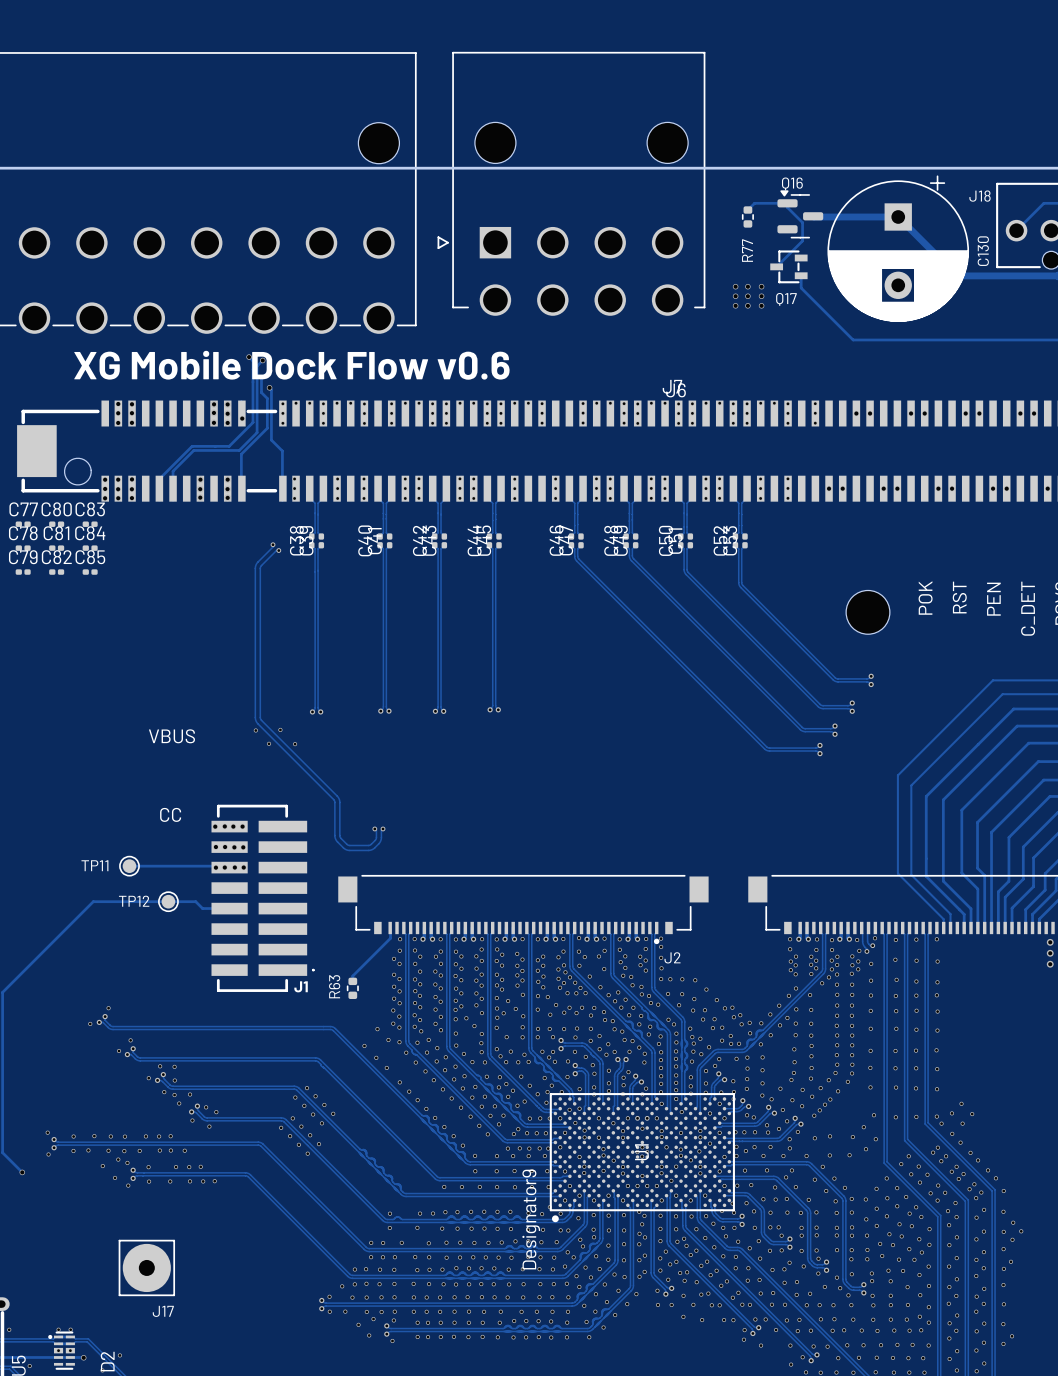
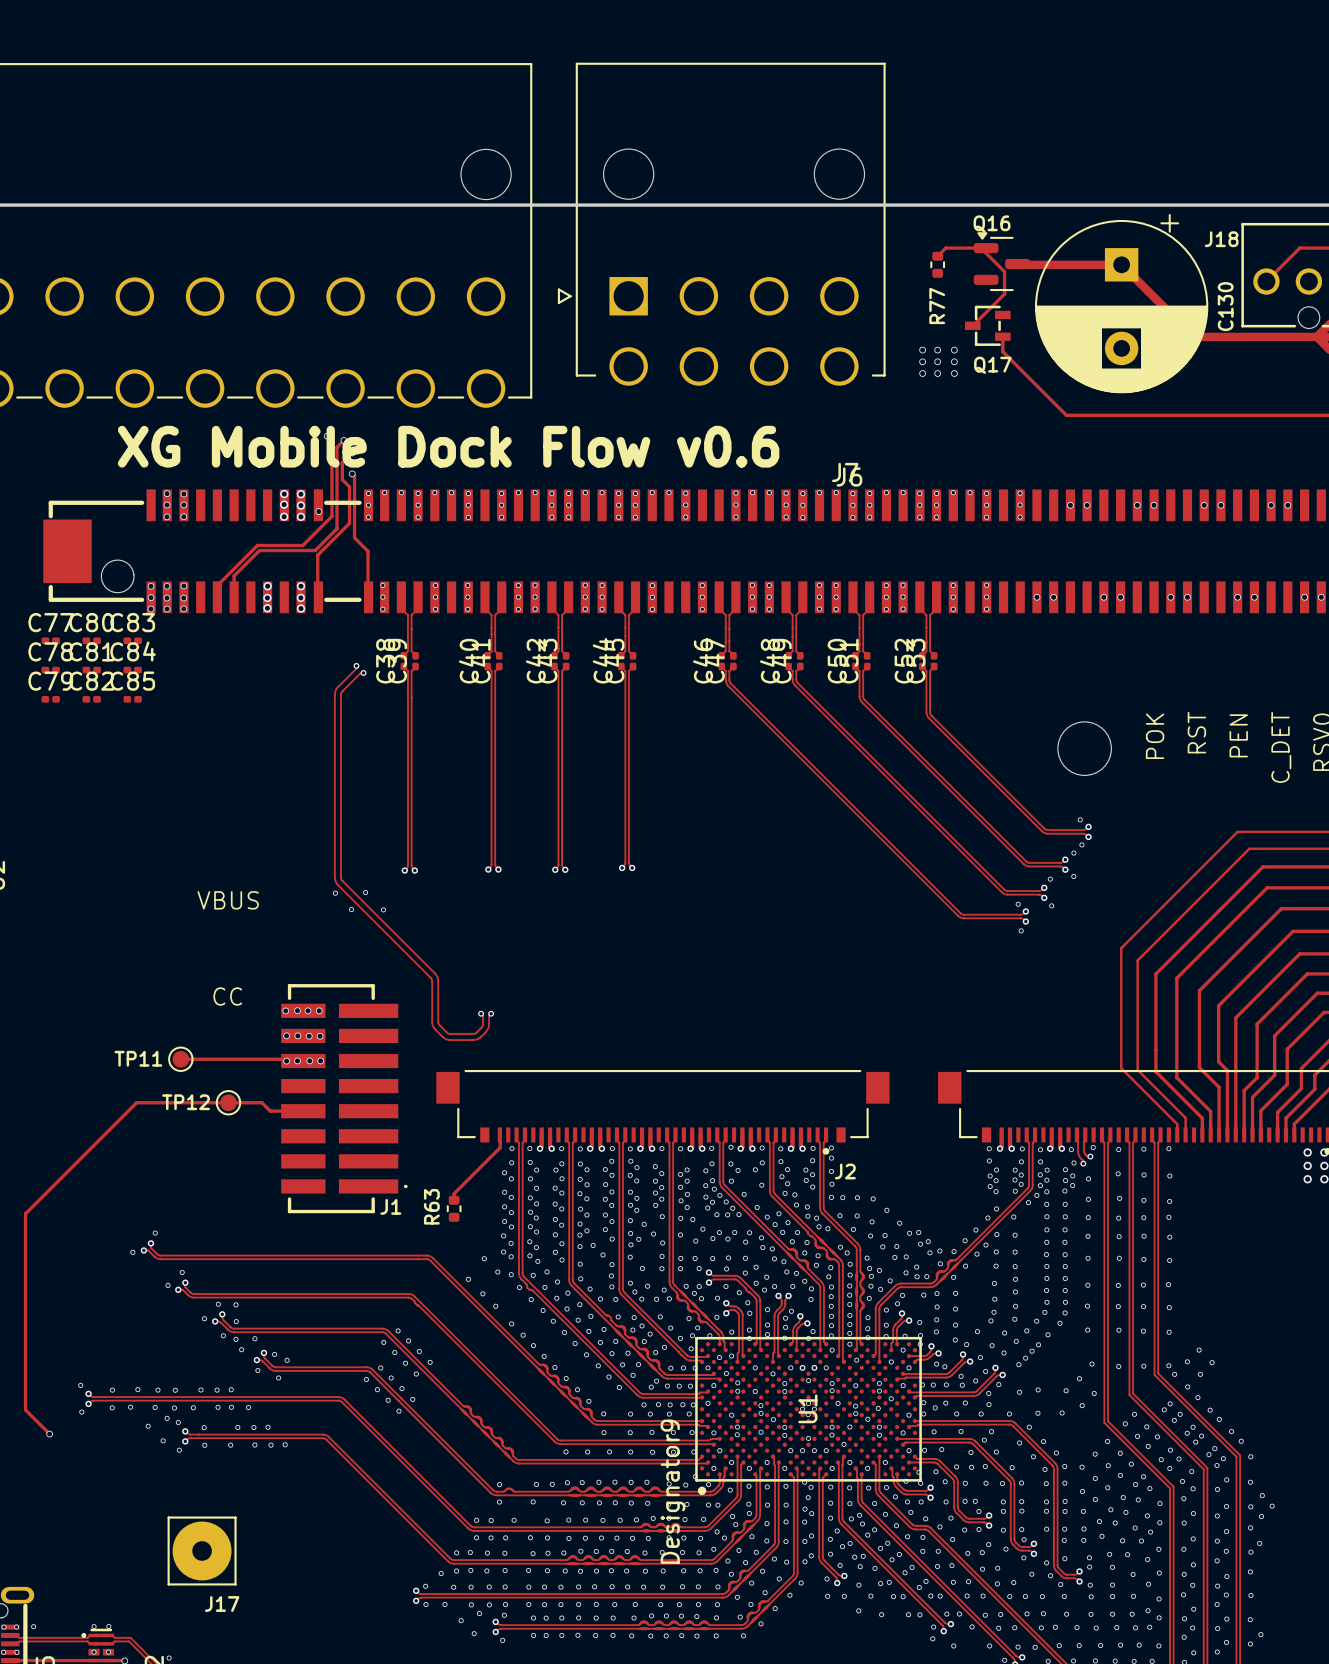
via: none -> (1080, 819)
via: none -> (1081, 844)
via: none -> (1073, 853)
via: none -> (1073, 876)
via: none -> (1050, 879)
via: none -> (1018, 904)
via: none -> (1051, 905)
via: none -> (1021, 930)

